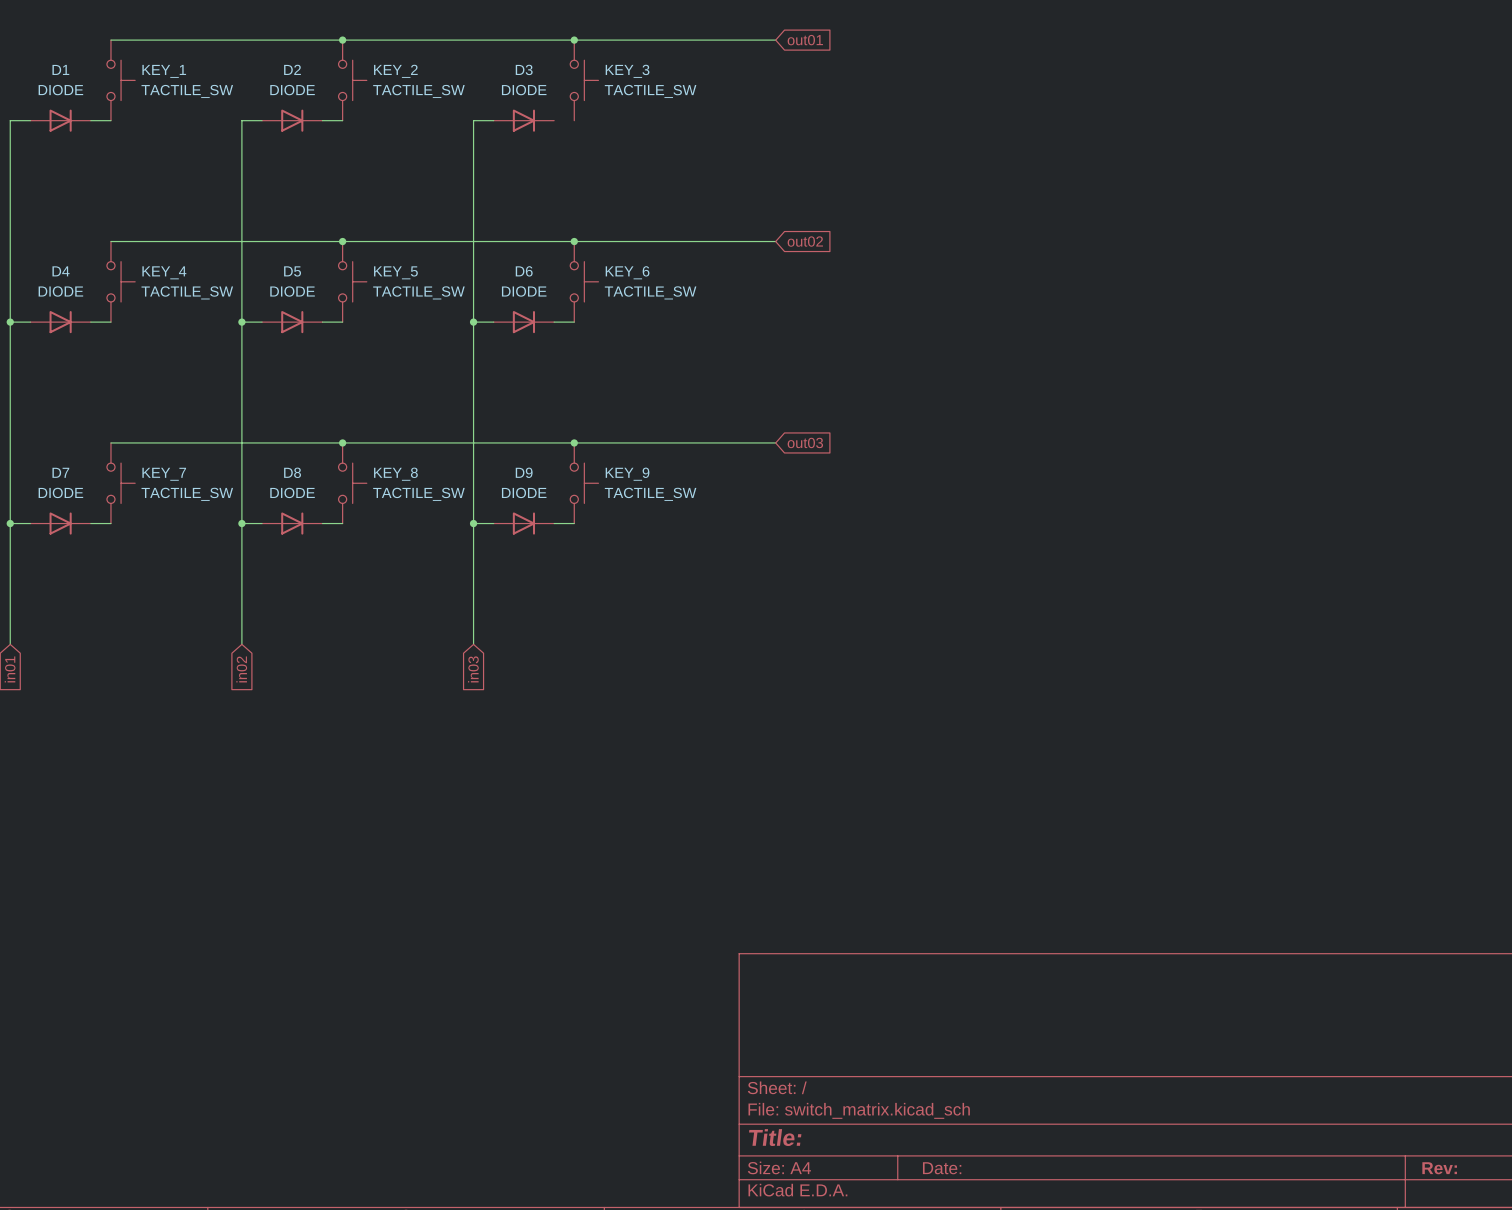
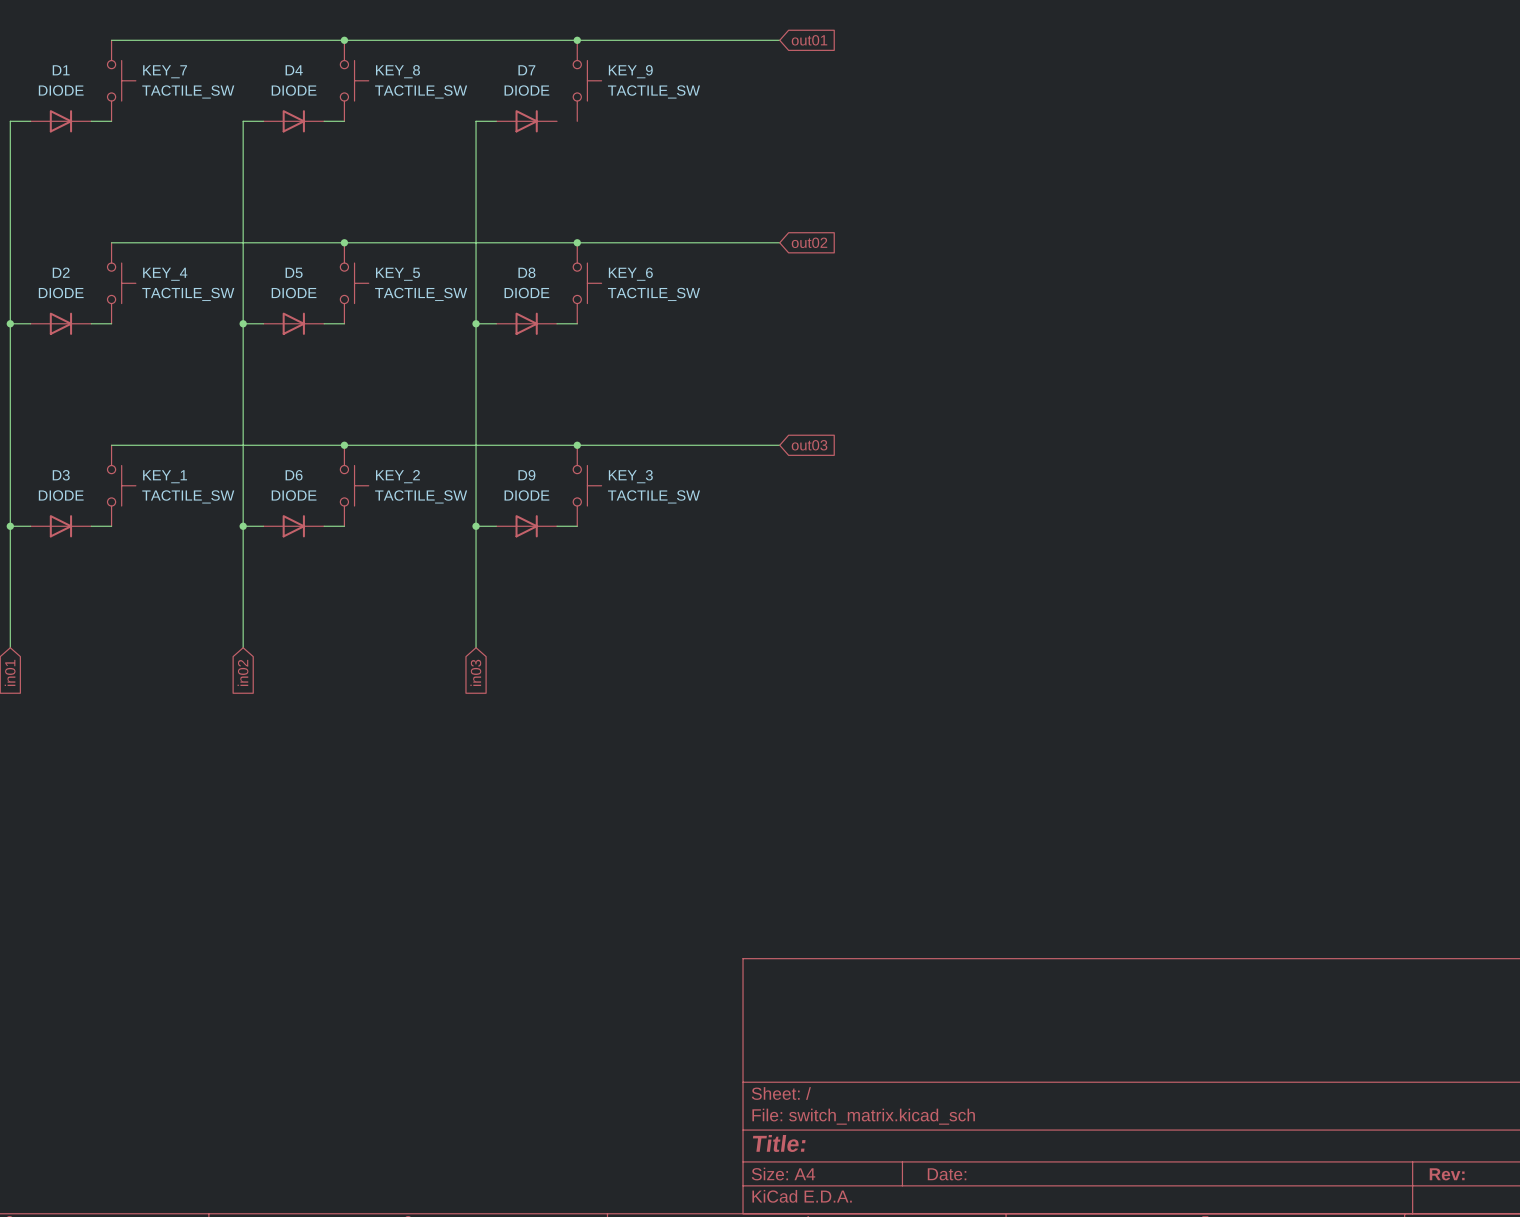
D2 name: D2 (292, 69) -> D4 (294, 70)
D3 name: D3 (524, 69) -> D7 (526, 70)
KEY_1 name: KEY_1 (164, 71) -> KEY_7 (165, 71)
KEY_2 name: KEY_2 (395, 71) -> KEY_8 (397, 71)
KEY_3 name: KEY_3 (627, 71) -> KEY_9 (630, 71)
D4 name: D4 (61, 271) -> D2 (61, 272)
D6 name: D6 (524, 271) -> D8 (526, 272)
D7 name: D7 (60, 472) -> D3 (61, 475)
D8 name: D8 (292, 472) -> D6 (294, 475)
KEY_7 name: KEY_7 (164, 474) -> KEY_1 (165, 476)
KEY_8 name: KEY_8 (395, 474) -> KEY_2 (397, 476)
KEY_9 name: KEY_9 (627, 474) -> KEY_3 (630, 476)

